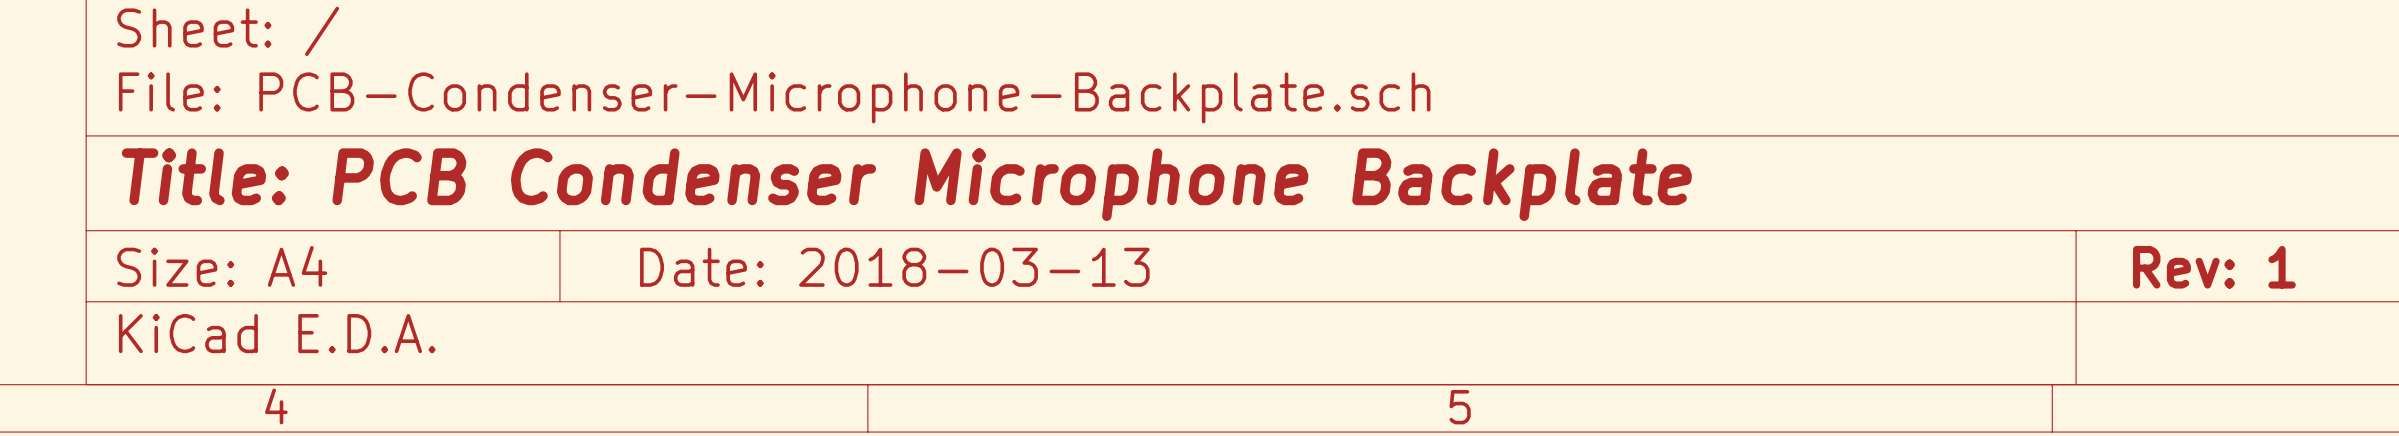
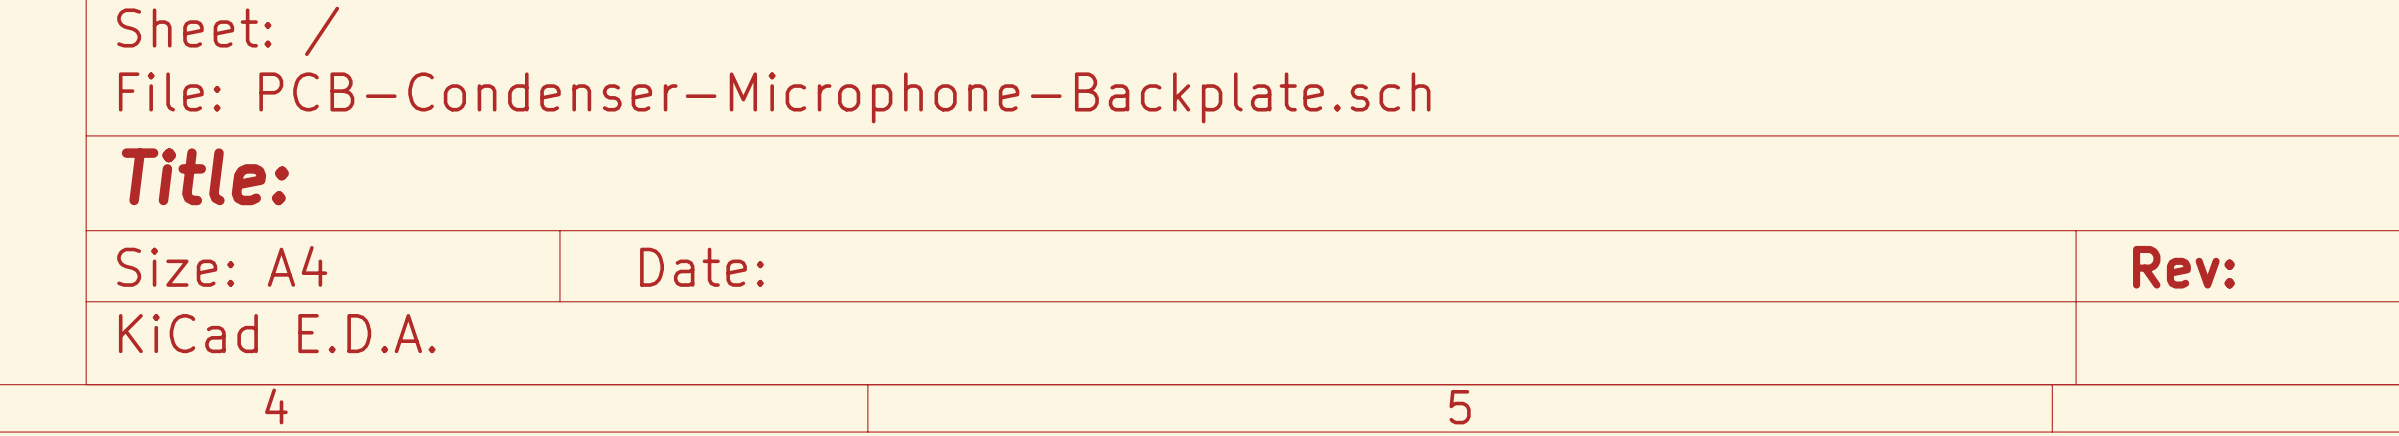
title block: Title: PCB Condenser Microphone Backplate (906, 184) -> Title: (205, 176)
title block: Date: 2018-03-13 (894, 267) -> Date: (701, 267)
title block: Rev: 1 (2214, 267) -> Rev: (2183, 267)

